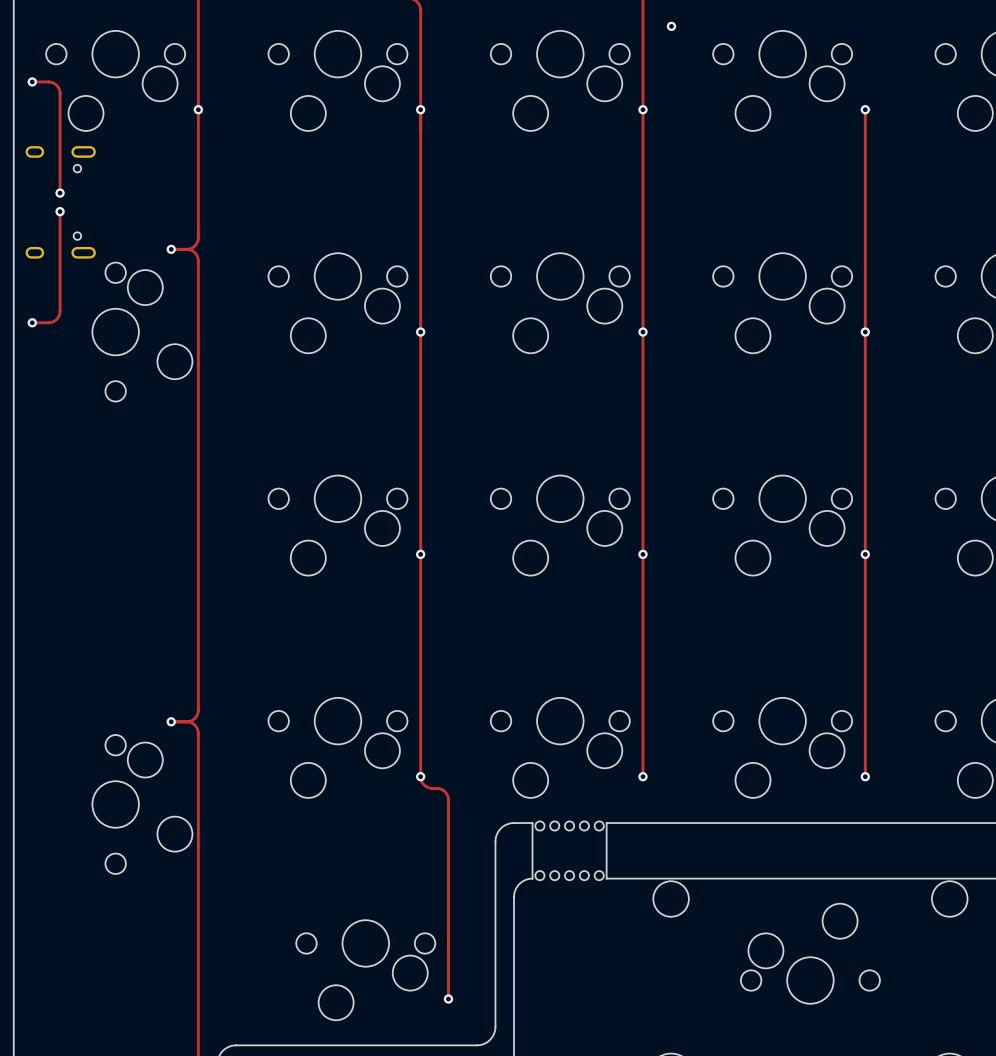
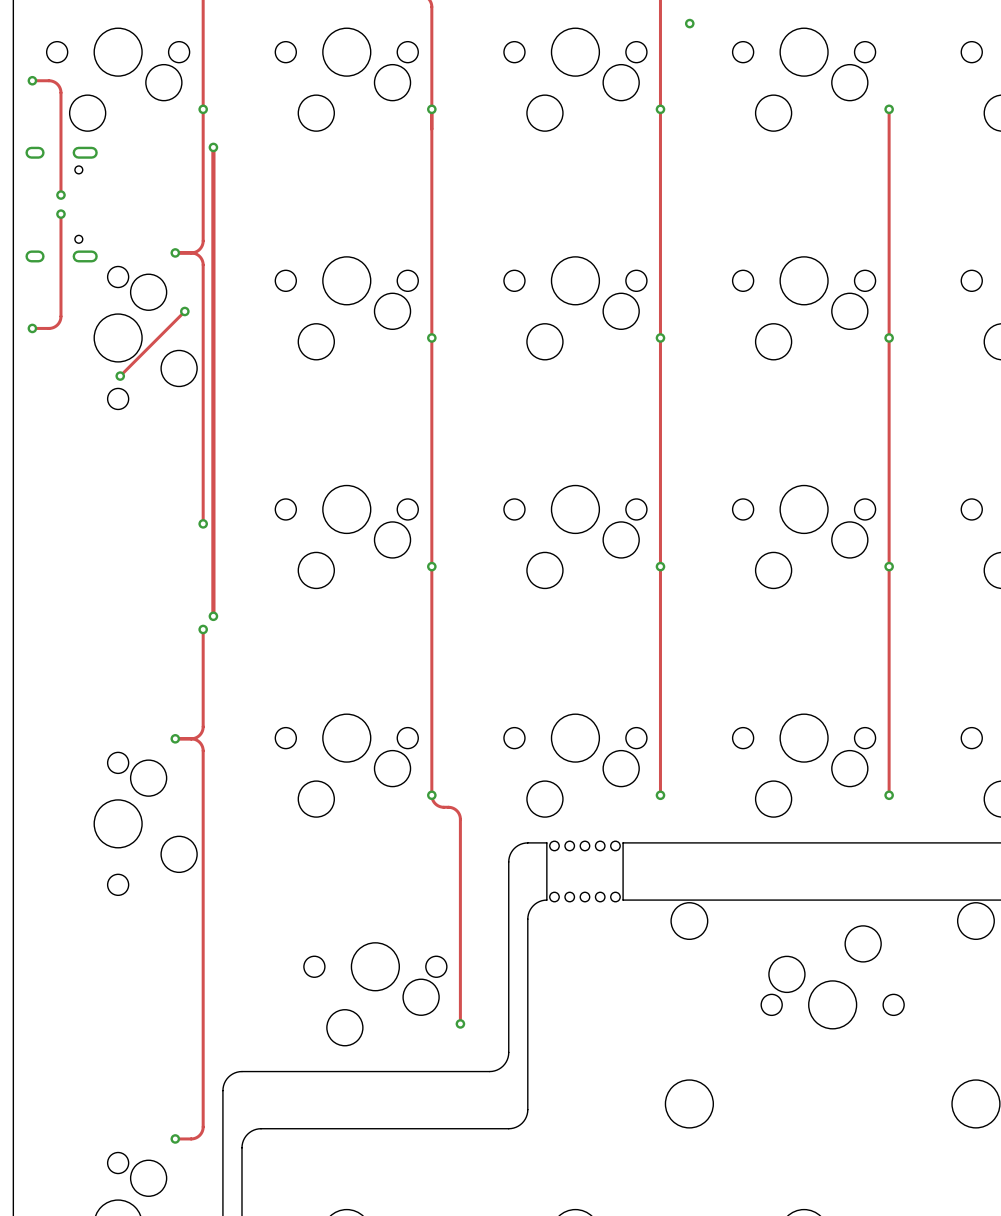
track: none -> (213, 147) (213, 616)
via: none -> (213, 147)
track: none -> (184, 311) (120, 376)
via: none -> (184, 311)
via: none -> (120, 376)
track: (198, 512) (198, 615) -> none
via: none -> (203, 523)
via: none -> (213, 616)
via: none -> (203, 629)

